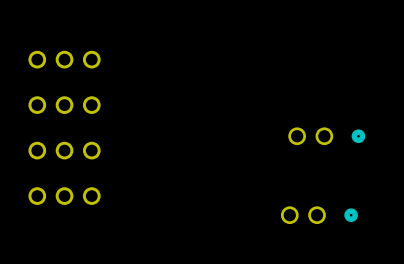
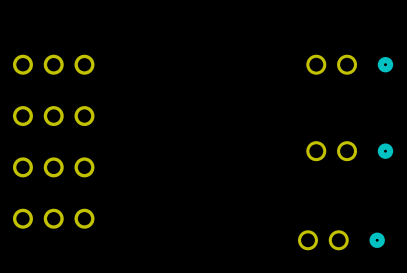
part: none -> (349, 64)

